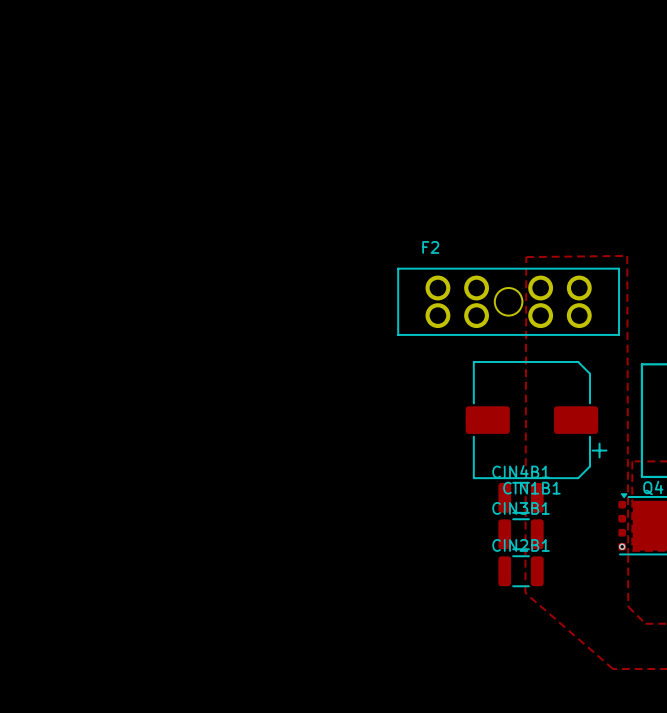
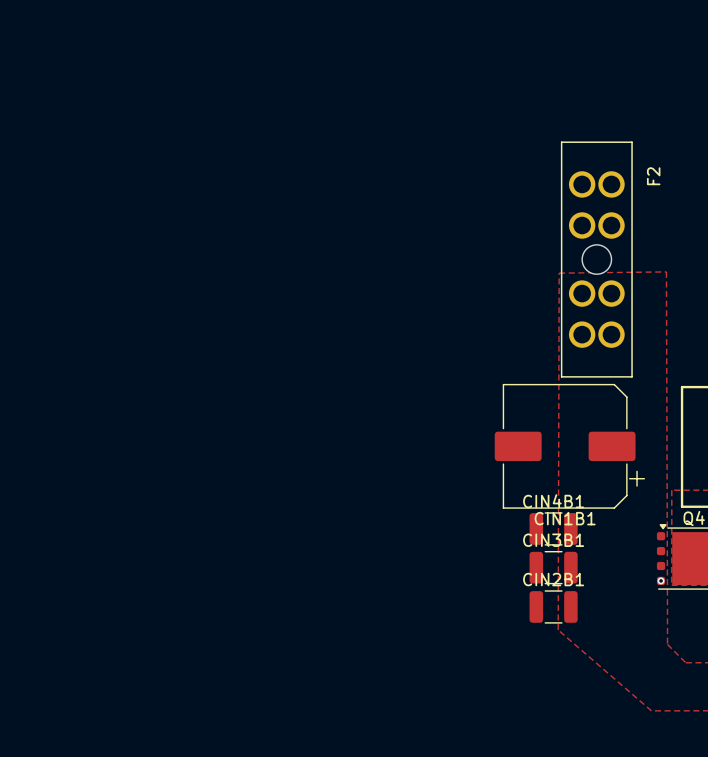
F2 rotation: 0° (508, 301) -> 90° clockwise (596, 259)

